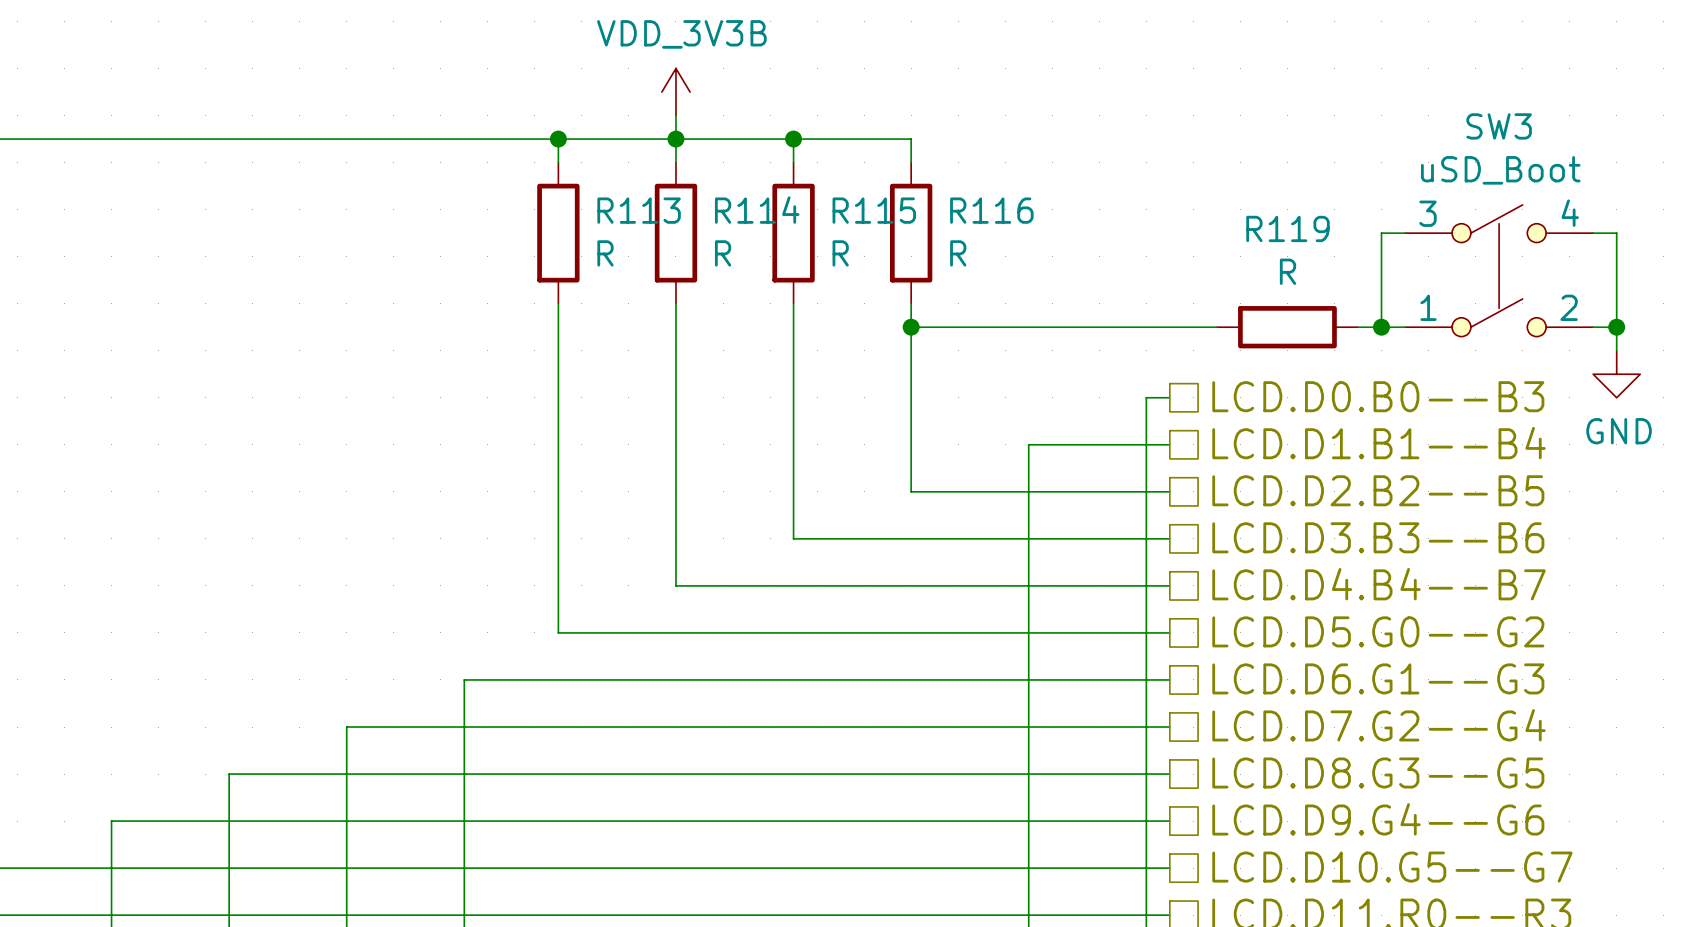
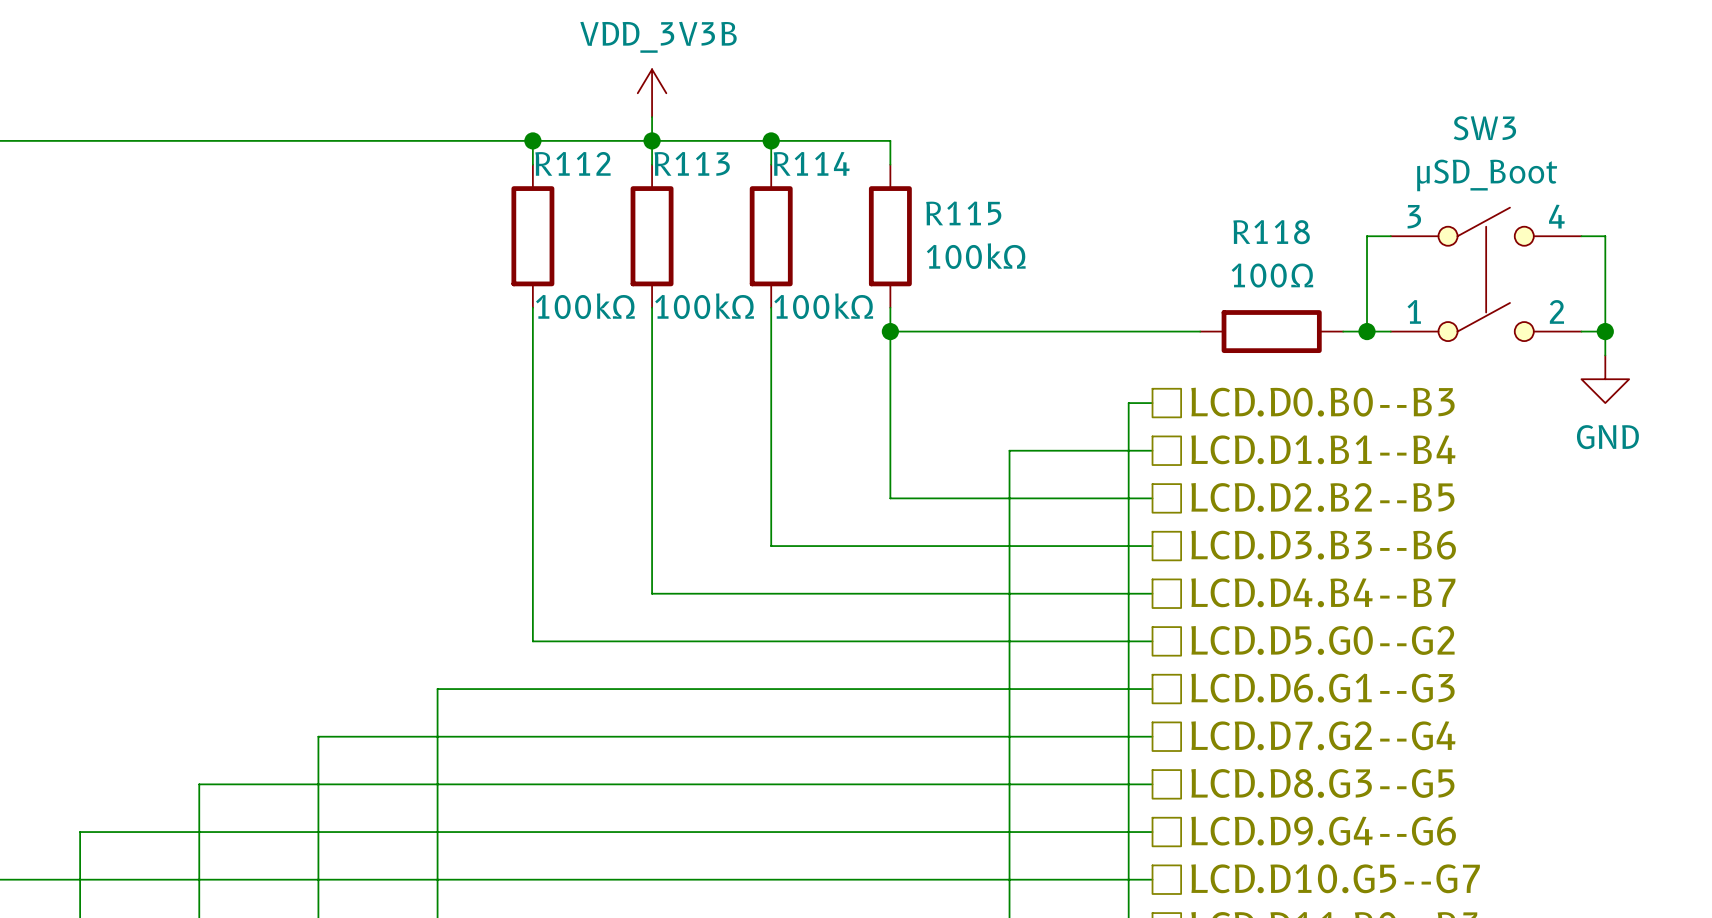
SW3 value: uSD_Boot (1500, 170) -> μSD_Boot (1487, 175)
R113 name: R113 (639, 210) -> R112 (572, 163)
R114 name: R114 (757, 210) -> R113 (692, 163)
R115 name: R115 (874, 210) -> R114 (811, 163)
R116 name: R116 (991, 210) -> R115 (963, 213)
R119 name: R119 (1287, 228) -> R118 (1271, 232)
R113 value: R (605, 253) -> 100kΩ (585, 306)
R114 value: R (723, 253) -> 100kΩ (704, 306)
R115 value: R (840, 253) -> 100kΩ (823, 306)
R116 value: R (958, 253) -> 100kΩ (976, 256)
R119 value: R (1287, 271) -> 100Ω (1272, 275)

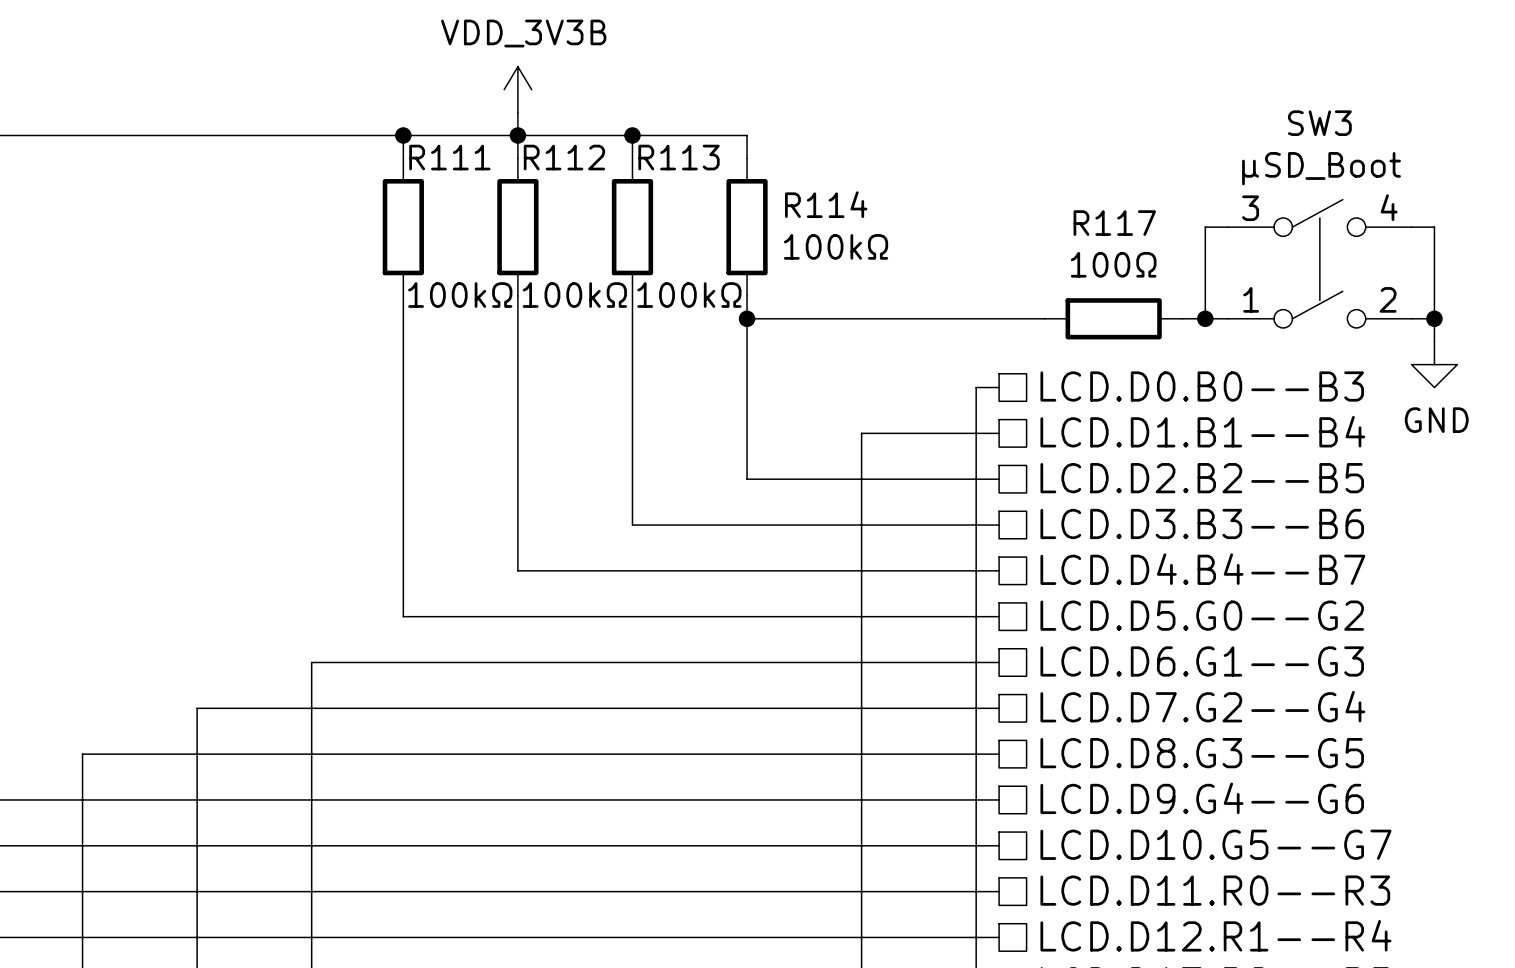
R112 name: R112 (572, 163) -> R111 (449, 157)
R113 name: R113 (692, 163) -> R112 (564, 157)
R114 name: R114 (811, 163) -> R113 (679, 157)
R115 name: R115 (963, 213) -> R114 (826, 204)
R118 name: R118 (1271, 232) -> R117 (1114, 223)

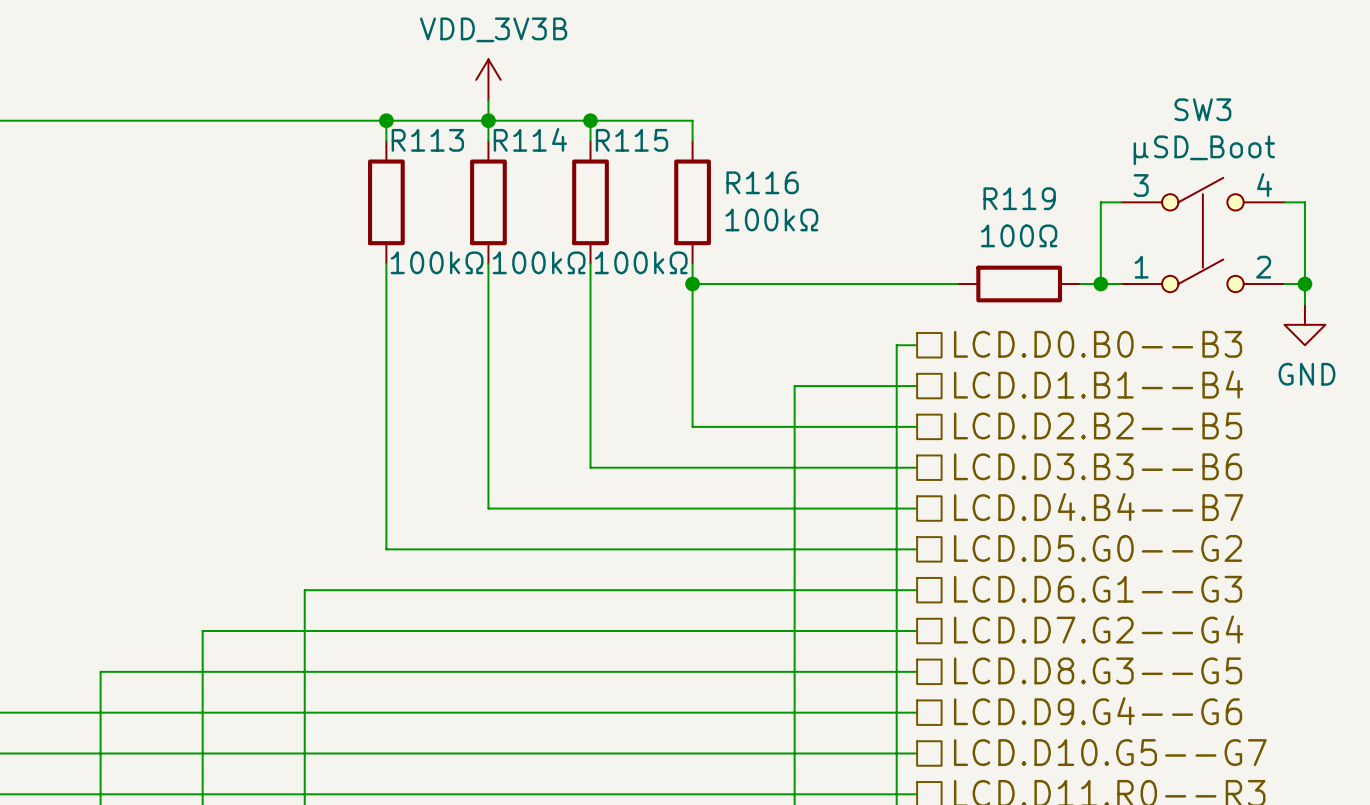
R111 name: R111 (449, 157) -> R113 (427, 140)
R112 name: R112 (564, 157) -> R114 (530, 139)
R113 name: R113 (679, 157) -> R115 (631, 140)
R114 name: R114 (826, 204) -> R116 (762, 182)
R117 name: R117 (1114, 223) -> R119 (1019, 198)

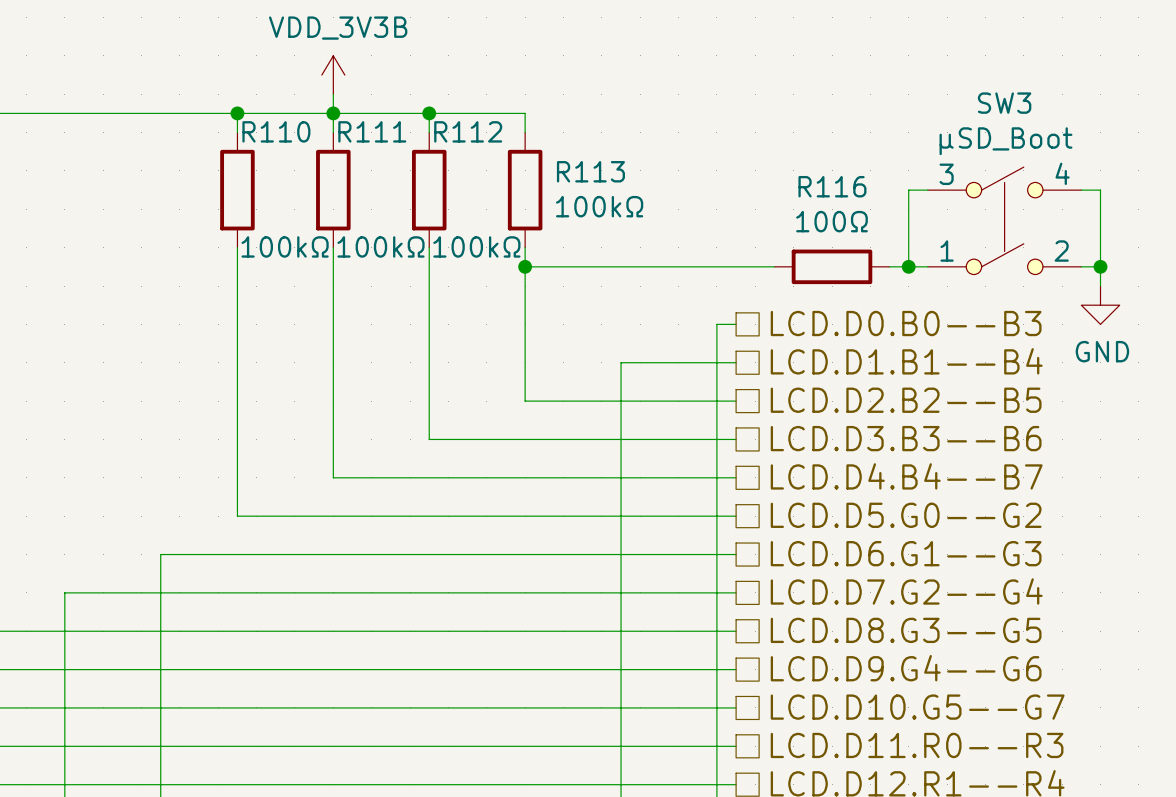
R114 name: R114 (530, 139) -> R111 (372, 131)
R113 name: R113 (427, 140) -> R110 (276, 131)
R115 name: R115 (631, 140) -> R112 (468, 131)
R116 name: R116 (762, 182) -> R113 (590, 171)
R119 name: R119 (1019, 198) -> R116 (832, 186)

